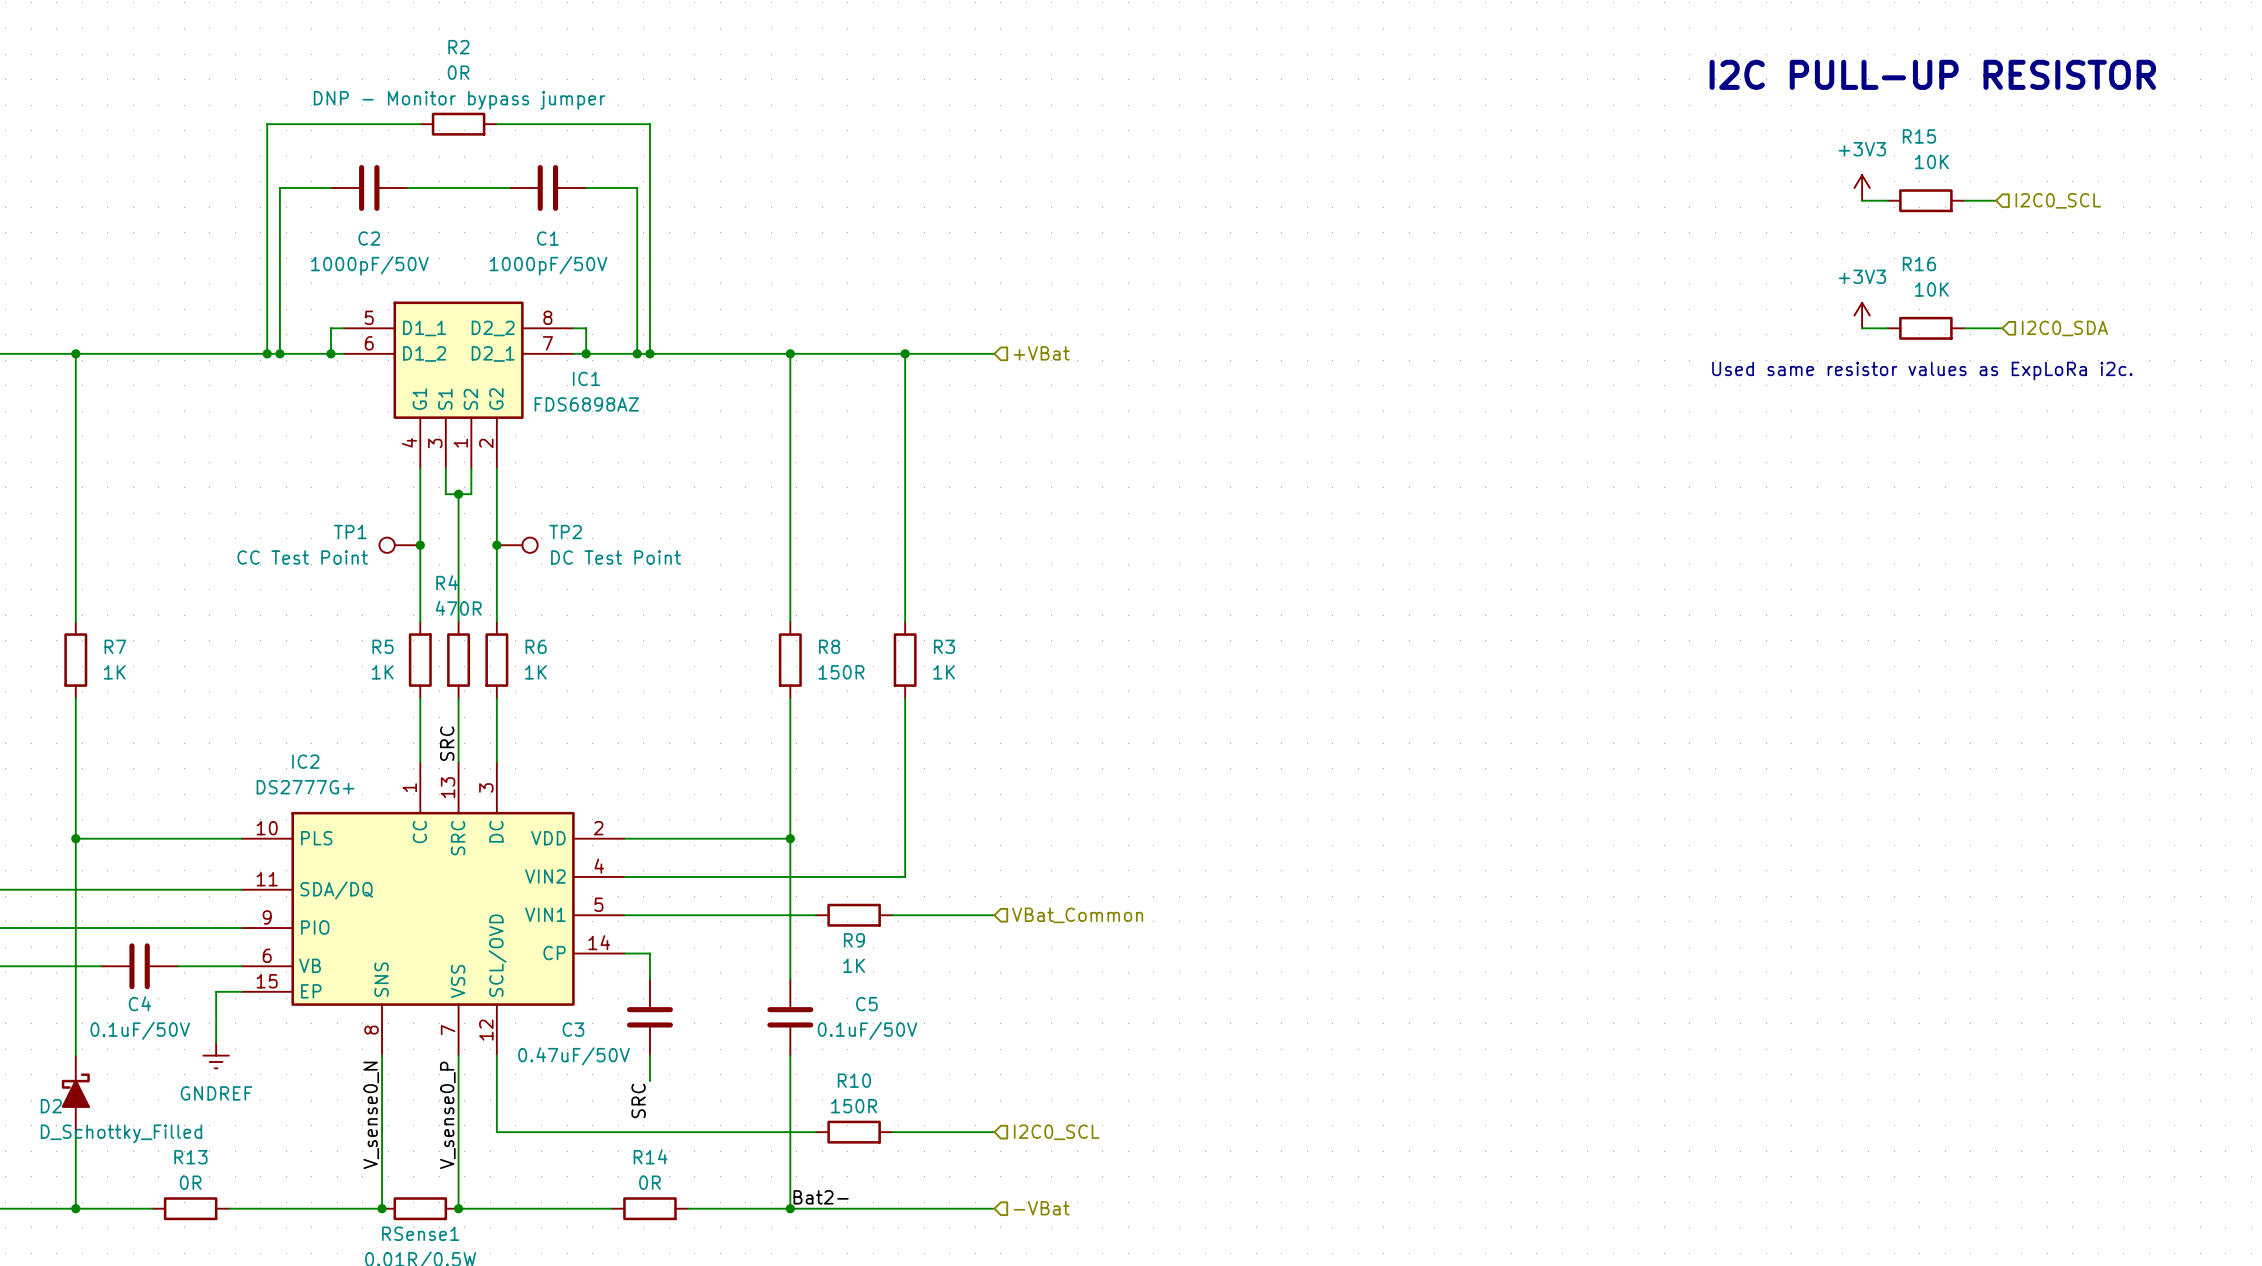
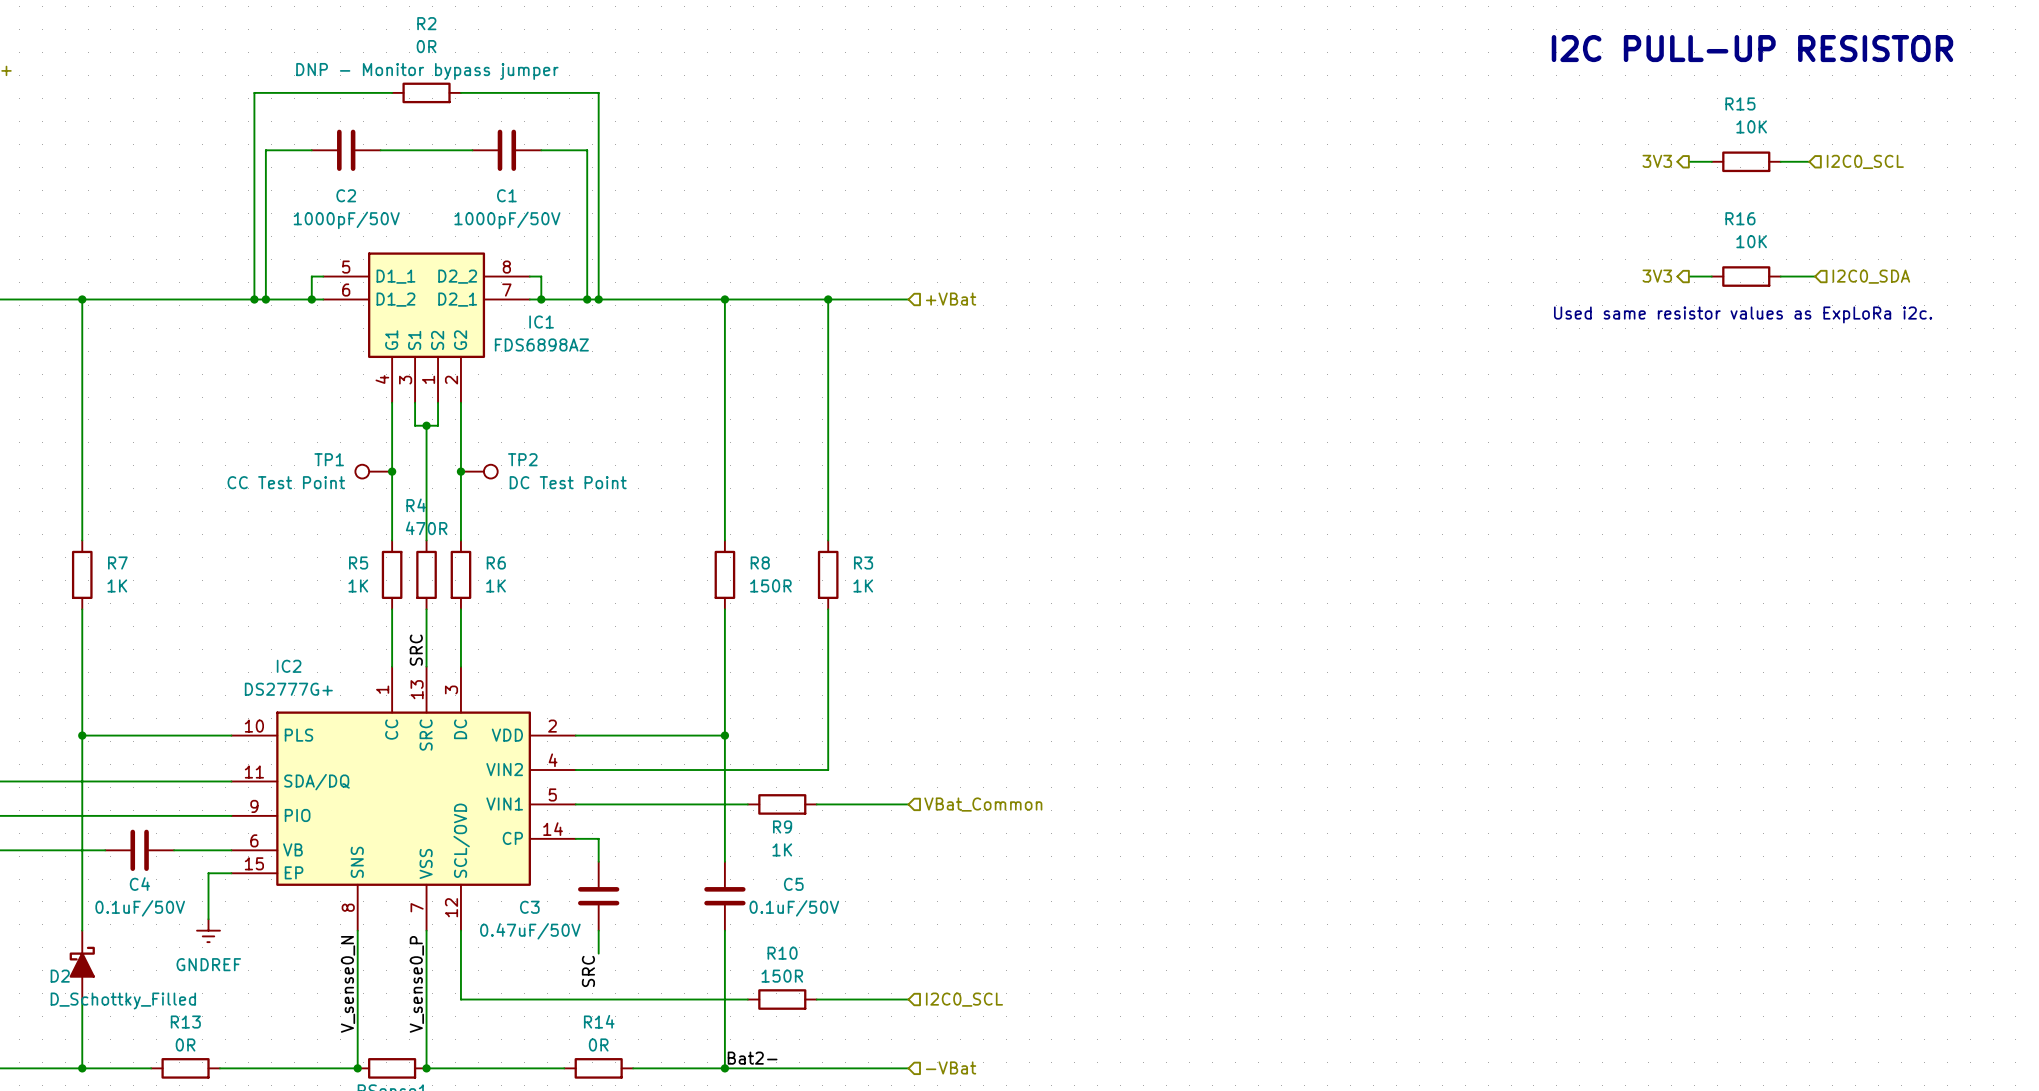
power symbol: +3V3 (1862, 187) -> none
hierarchical label: none -> 3V3 (1657, 161)
power symbol: +3V3 (1862, 315) -> none
hierarchical label: none -> 3V3 (1657, 276)

